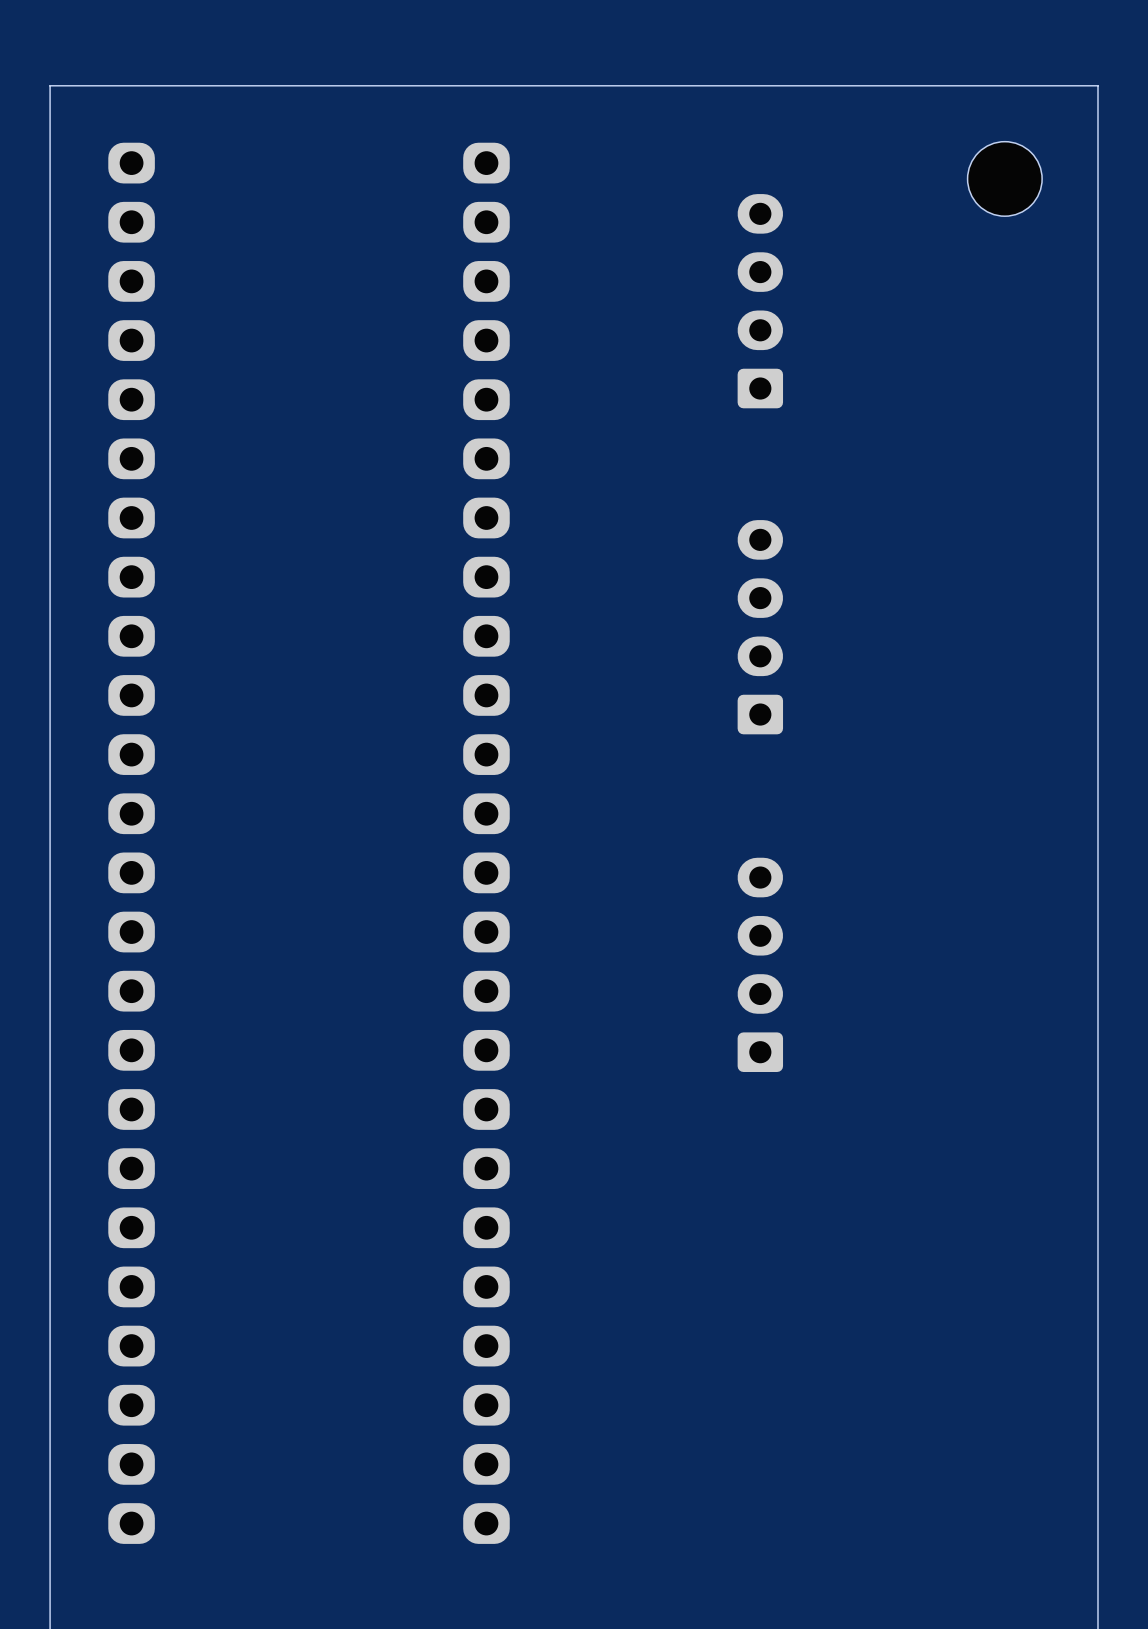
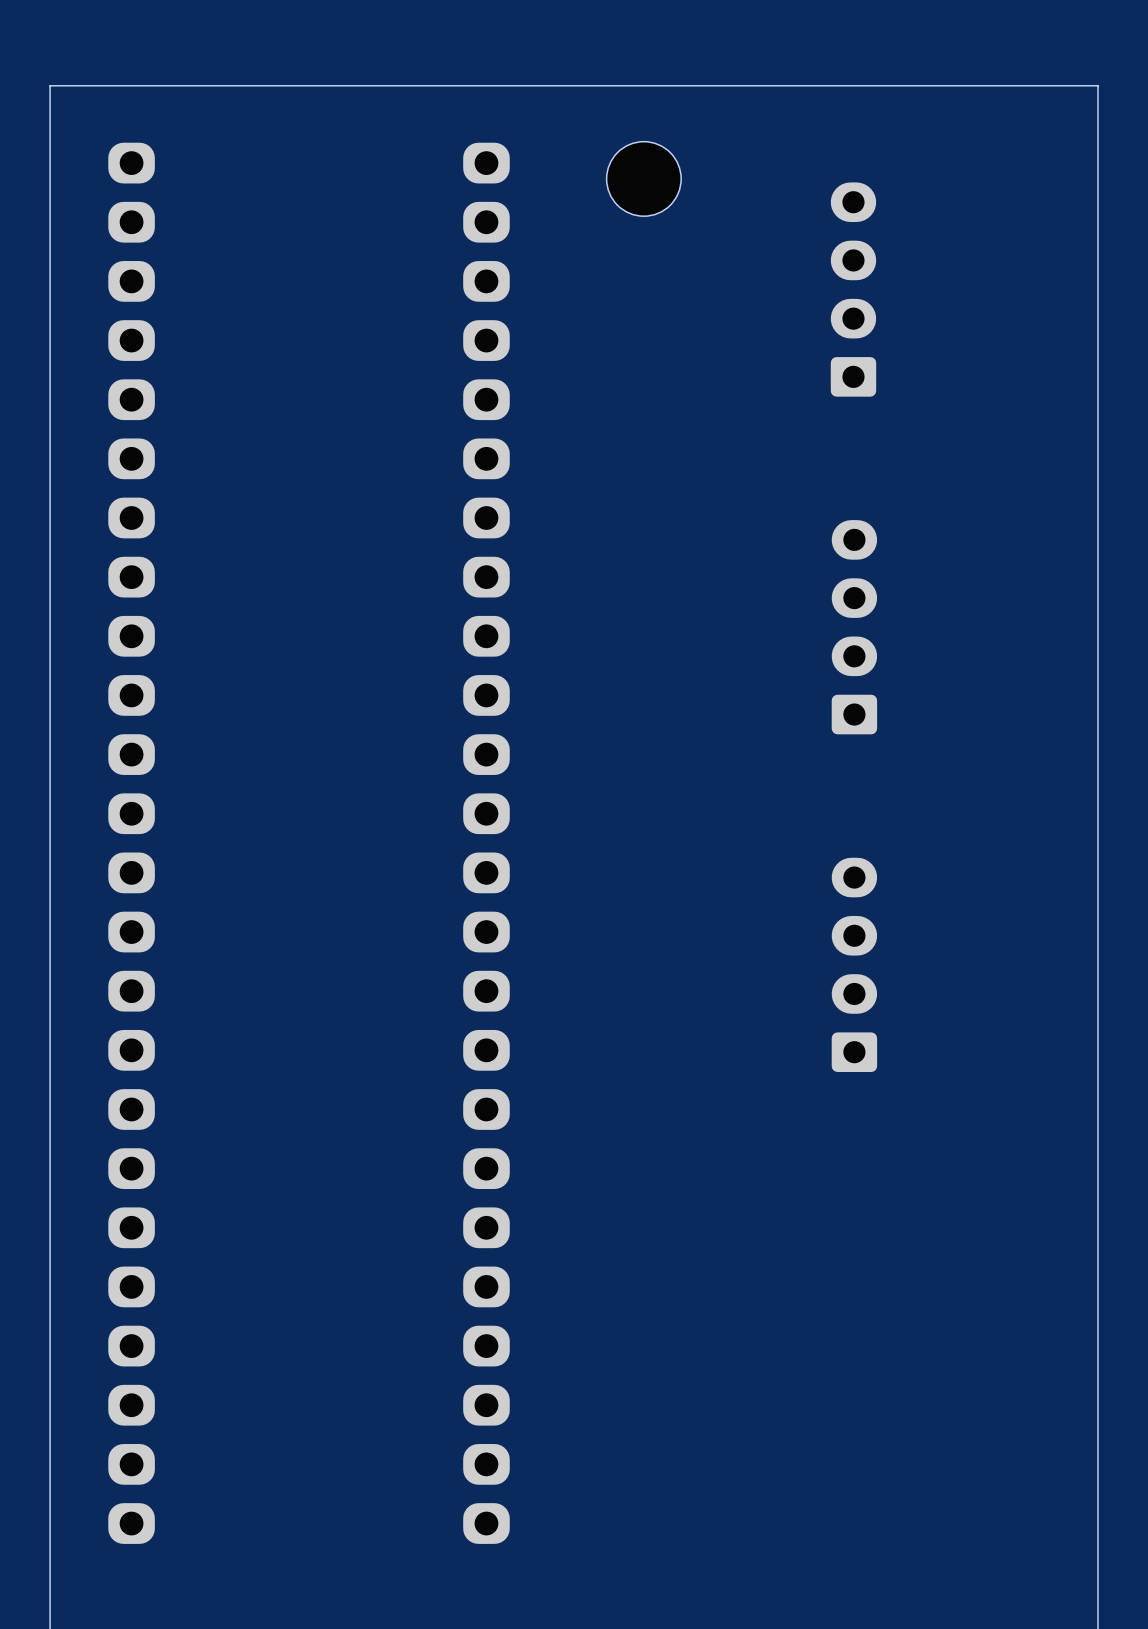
part position: (1004, 178) -> (643, 178)
part position: (760, 301) -> (853, 289)
part position: (760, 627) -> (854, 627)
part position: (760, 964) -> (854, 964)

